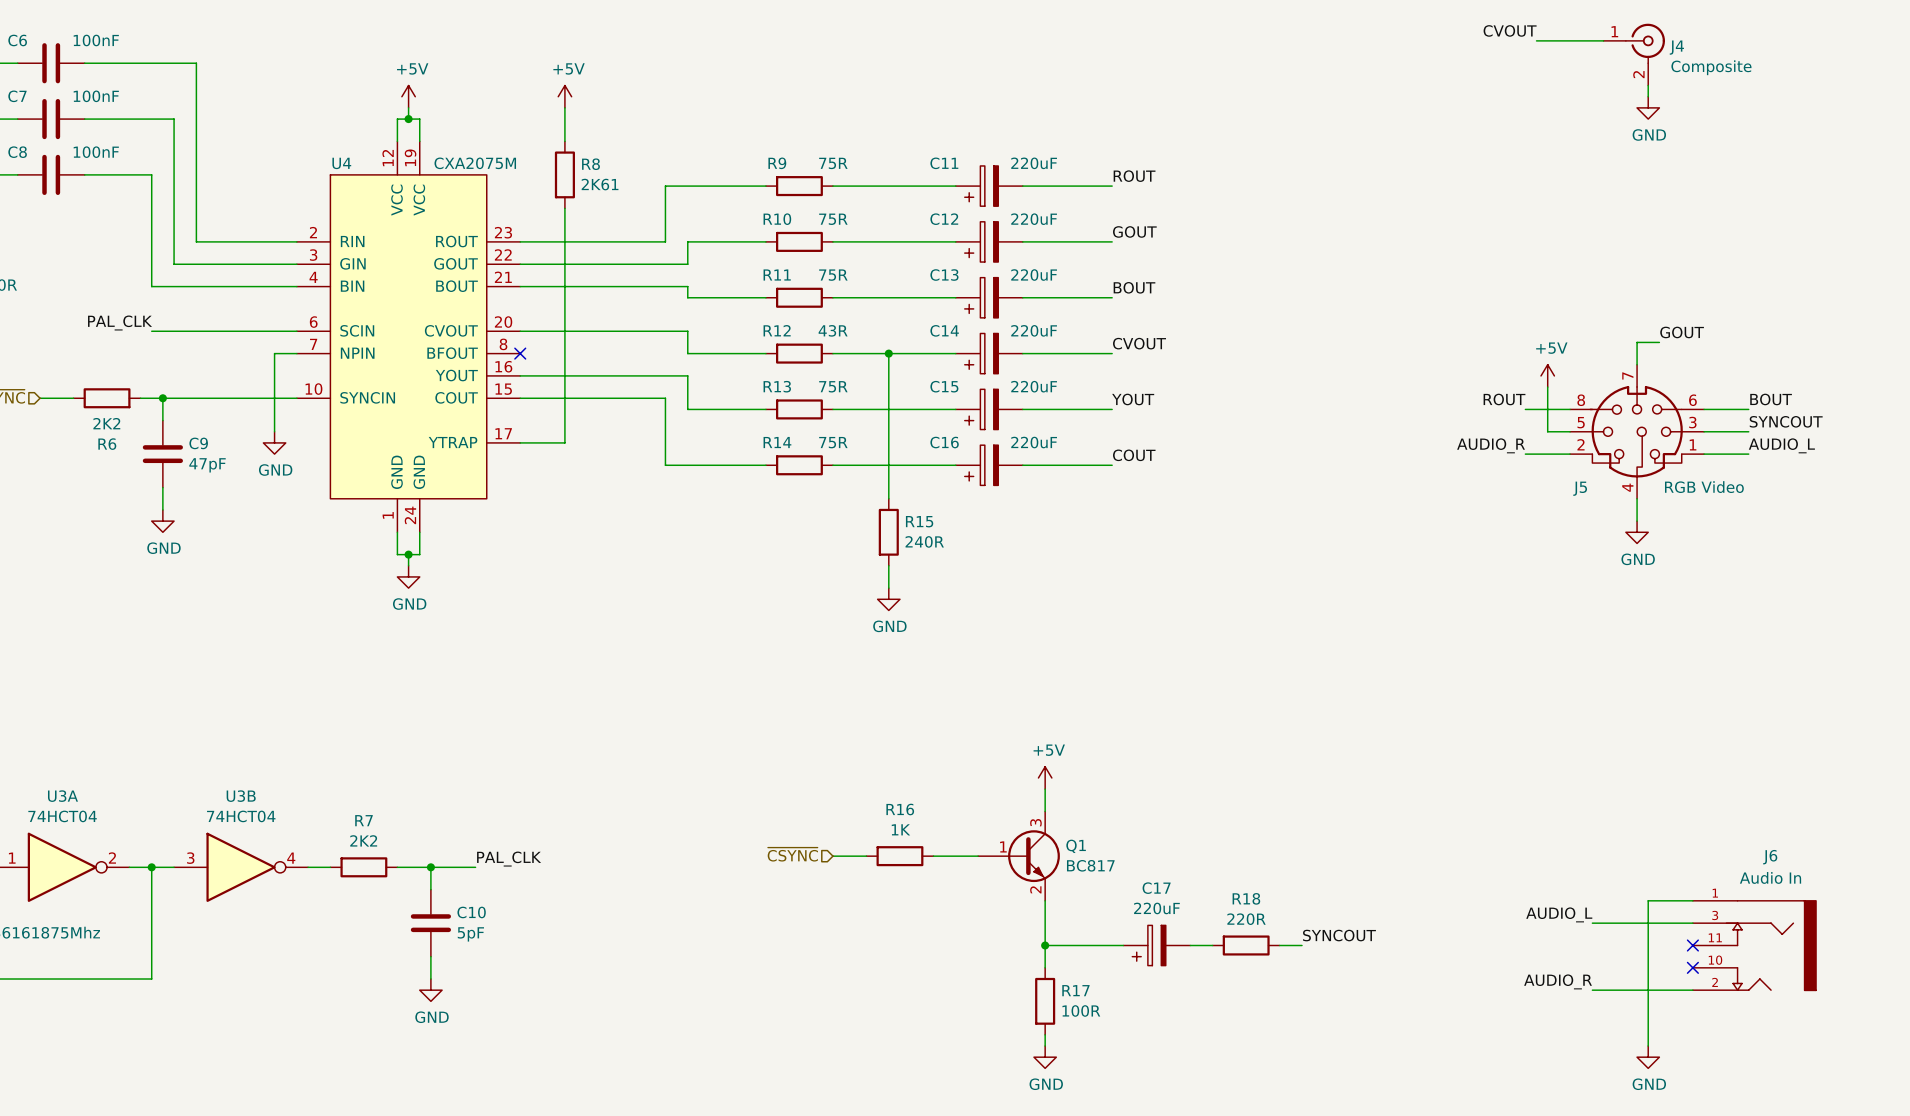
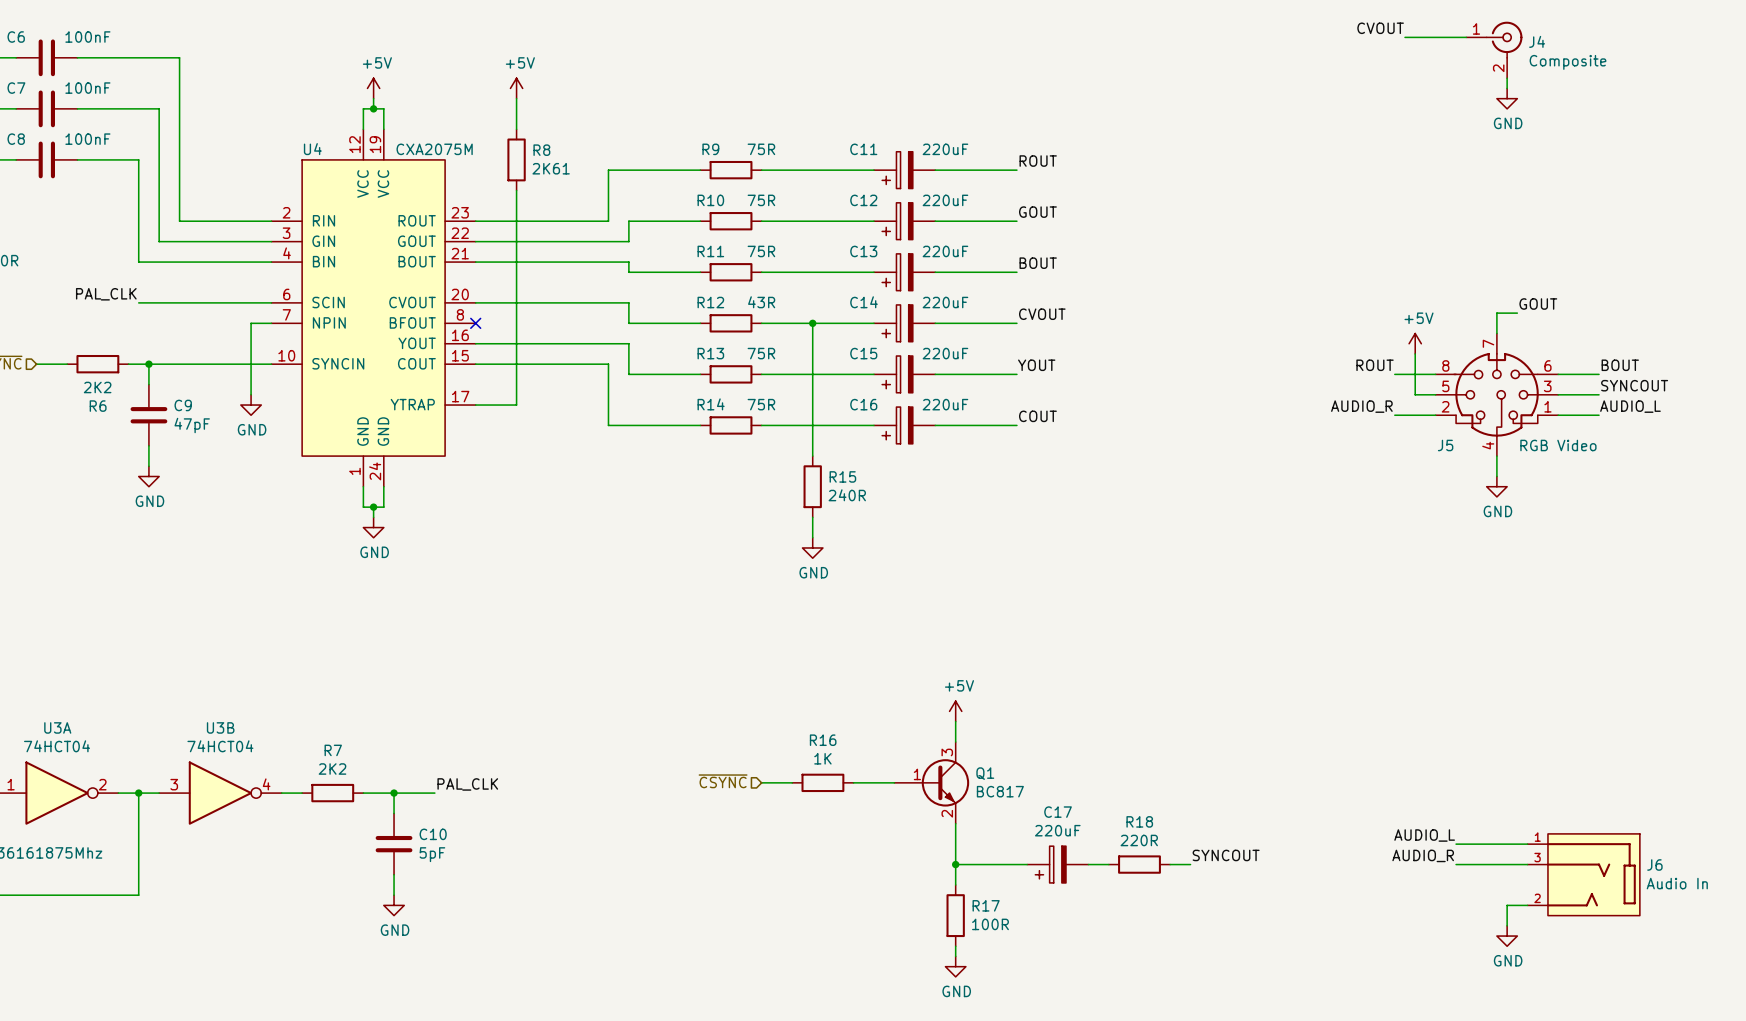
J6 name position: J6 (1770, 857) -> J6 (1654, 864)
J6 value position: Audio In (1770, 877) -> Audio In (1677, 883)
wire: (1692, 900) (1648, 900) (1648, 990) (1592, 990) -> none
J6 symbol: [1692, 900, 1817, 991] -> [1527, 833, 1640, 916]
wire: none -> (1456, 864) (1527, 864)
no-connect mark: (1692, 945) -> none
no-connect mark: (1692, 967) -> none
label position: AUDIO_R (1558, 981) -> AUDIO_R (1423, 855)
wire: (1648, 1012) (1648, 1046) -> none
power symbol position: GND (1648, 1057) -> GND (1507, 936)

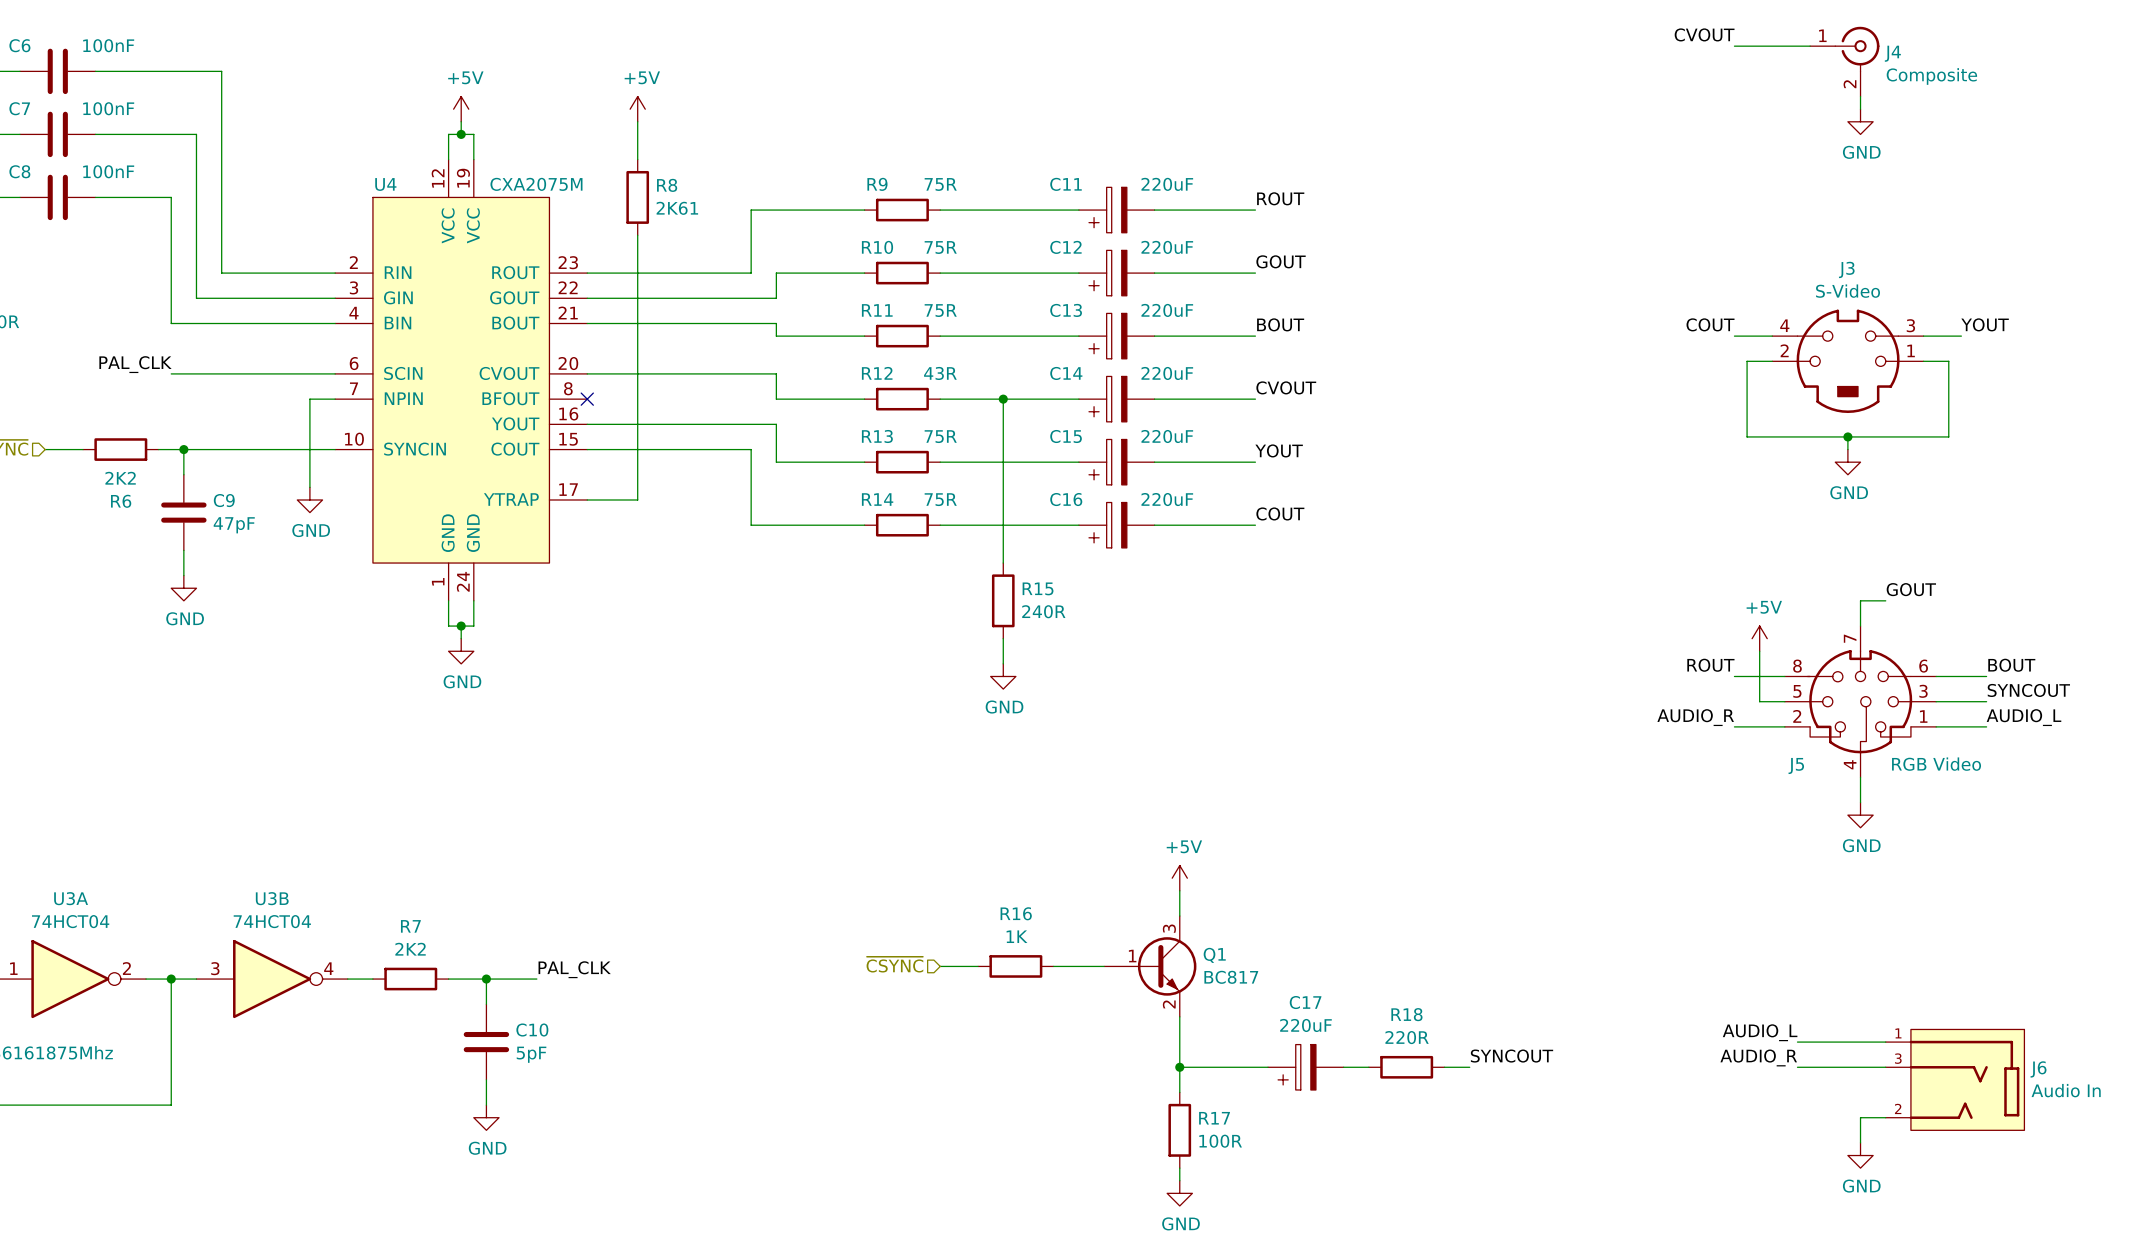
label: none -> COUT (1710, 324)
label: none -> YOUT (1985, 324)
wire: none -> (1734, 336) (1772, 336)
wire: none -> (1923, 336) (1961, 336)
wire: none -> (1772, 361) (1747, 361) (1747, 436) (1948, 436) (1948, 361) (1923, 361)
J3: none -> S-Video (1847, 361)
label position: GOUT (1538, 304) -> GOUT (1911, 589)
wire: (1517, 313) (1496, 313) (1496, 333) -> (1885, 600) (1860, 600) (1860, 626)
power symbol position: +5V (1415, 343) -> +5V (1759, 638)
wire: (1415, 353) (1415, 394) (1435, 394) -> (1759, 651) (1759, 701) (1784, 701)
junction: none -> (1847, 436)
label position: ROUT (1375, 365) -> ROUT (1710, 665)
label position: BOUT (1620, 365) -> BOUT (2011, 665)
wire: (1394, 374) (1435, 374) -> (1734, 676) (1784, 676)
power symbol: none -> GND (1847, 462)
wire: (1558, 374) (1599, 374) -> (1936, 676) (1986, 676)
label position: SYNCOUT (1634, 385) -> SYNCOUT (2028, 690)
J5 position: (1496, 394) -> (1860, 701)
wire: (1558, 394) (1599, 394) -> (1936, 701) (1986, 701)
label position: AUDIO_R (1361, 406) -> AUDIO_R (1695, 717)
label position: AUDIO_L (1630, 406) -> AUDIO_L (2024, 717)
wire: (1394, 415) (1435, 415) -> (1734, 726) (1784, 726)
wire: (1558, 415) (1599, 415) -> (1936, 726) (1986, 726)
wire: (1496, 456) (1496, 476) -> (1860, 777) (1860, 802)
power symbol: GND (1496, 486) -> none
power symbol: none -> GND (1860, 815)

